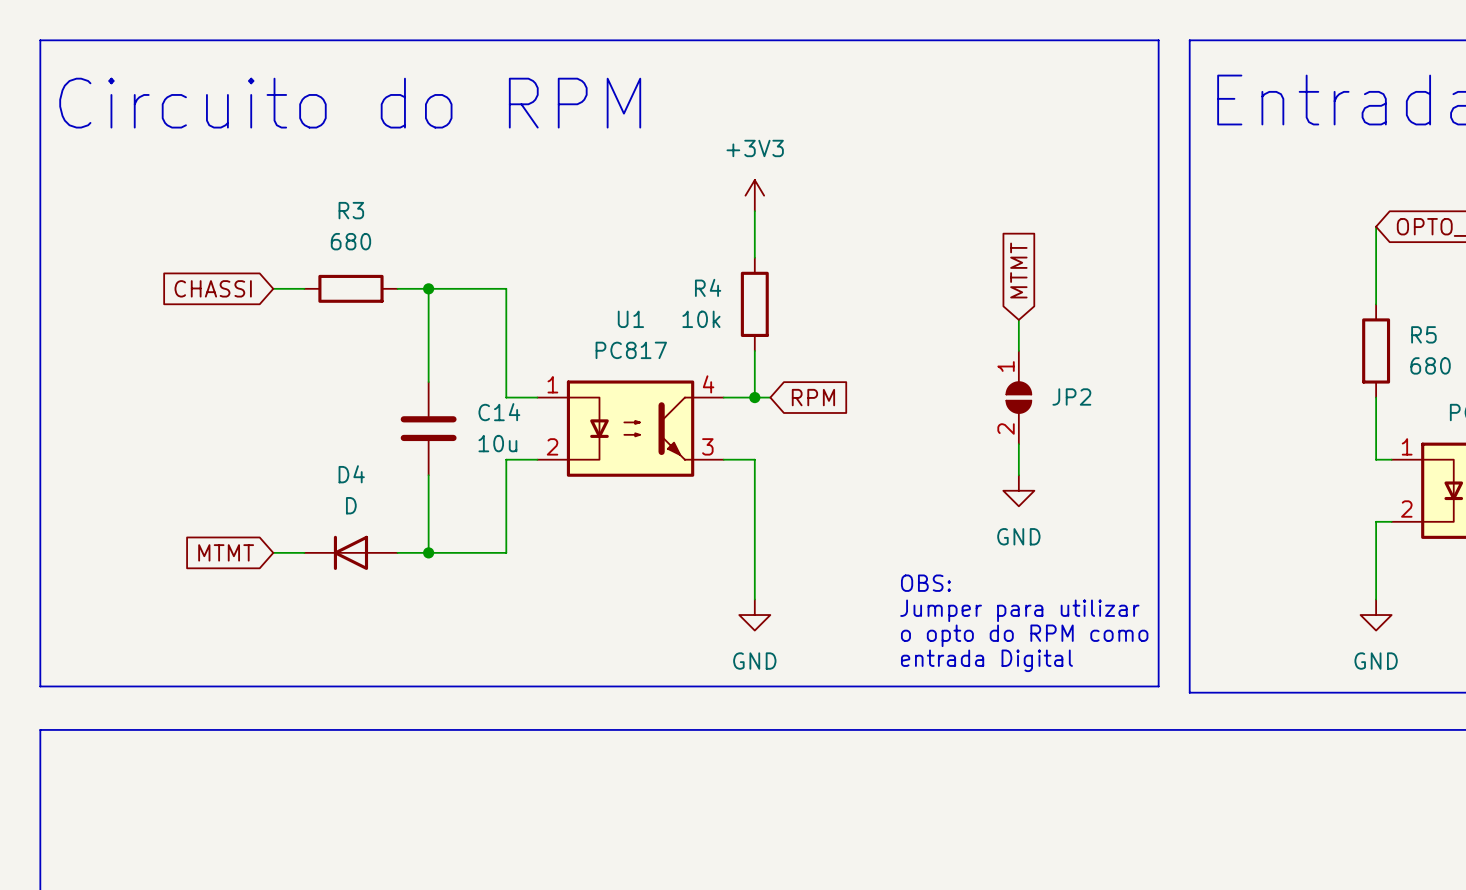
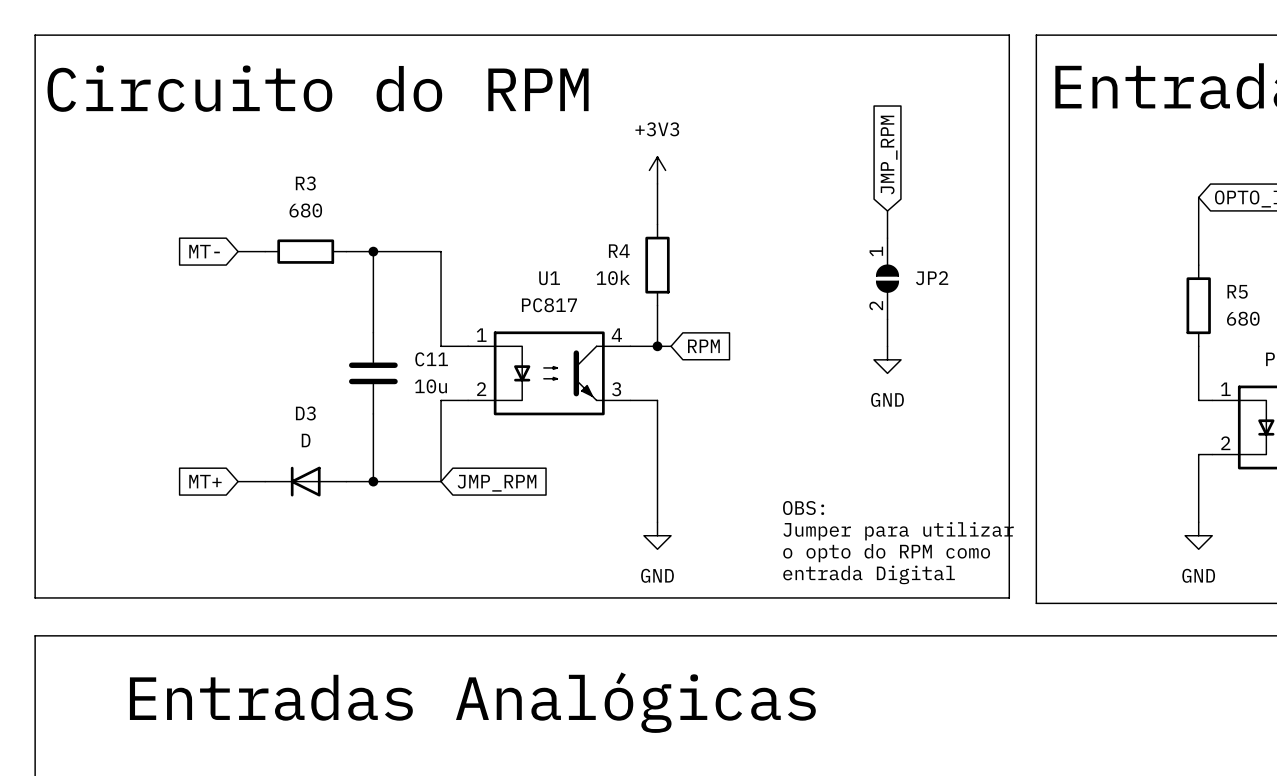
global label: none -> JMP_RPM (889, 155)
global label: MTMT (1018, 270) -> none
global label: CHASSI (213, 288) -> MT- (204, 251)
JP2 position: (1018, 397) -> (887, 278)
C14 name: C14 (499, 412) -> C11 (431, 359)
wire: (1018, 444) (1018, 475) -> (887, 211) (887, 238)
D4 name: D4 (351, 474) -> D3 (305, 413)
power symbol position: GND (1018, 490) -> GND (887, 359)
global label: MTMT (226, 552) -> MT+ (205, 481)
global label: none -> JMP_RPM (497, 483)
text: none -> Entradas Analógicas (472, 702)

